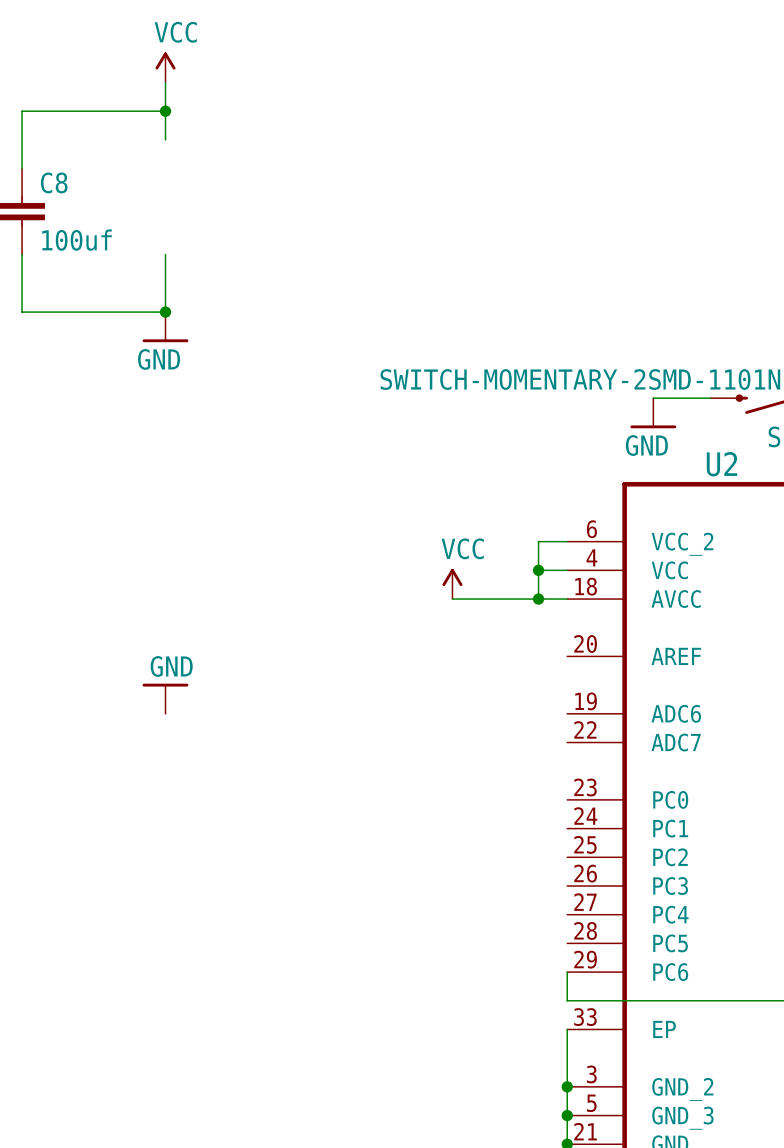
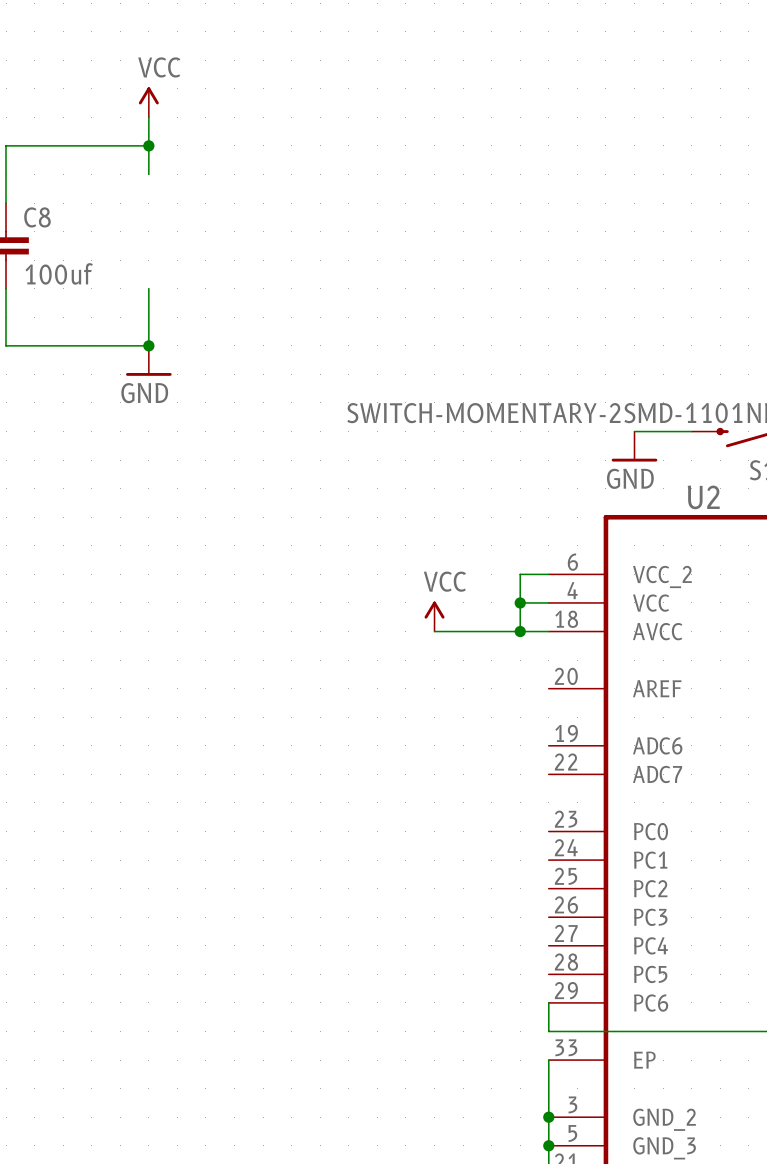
power symbol: GND (165, 698) -> none

